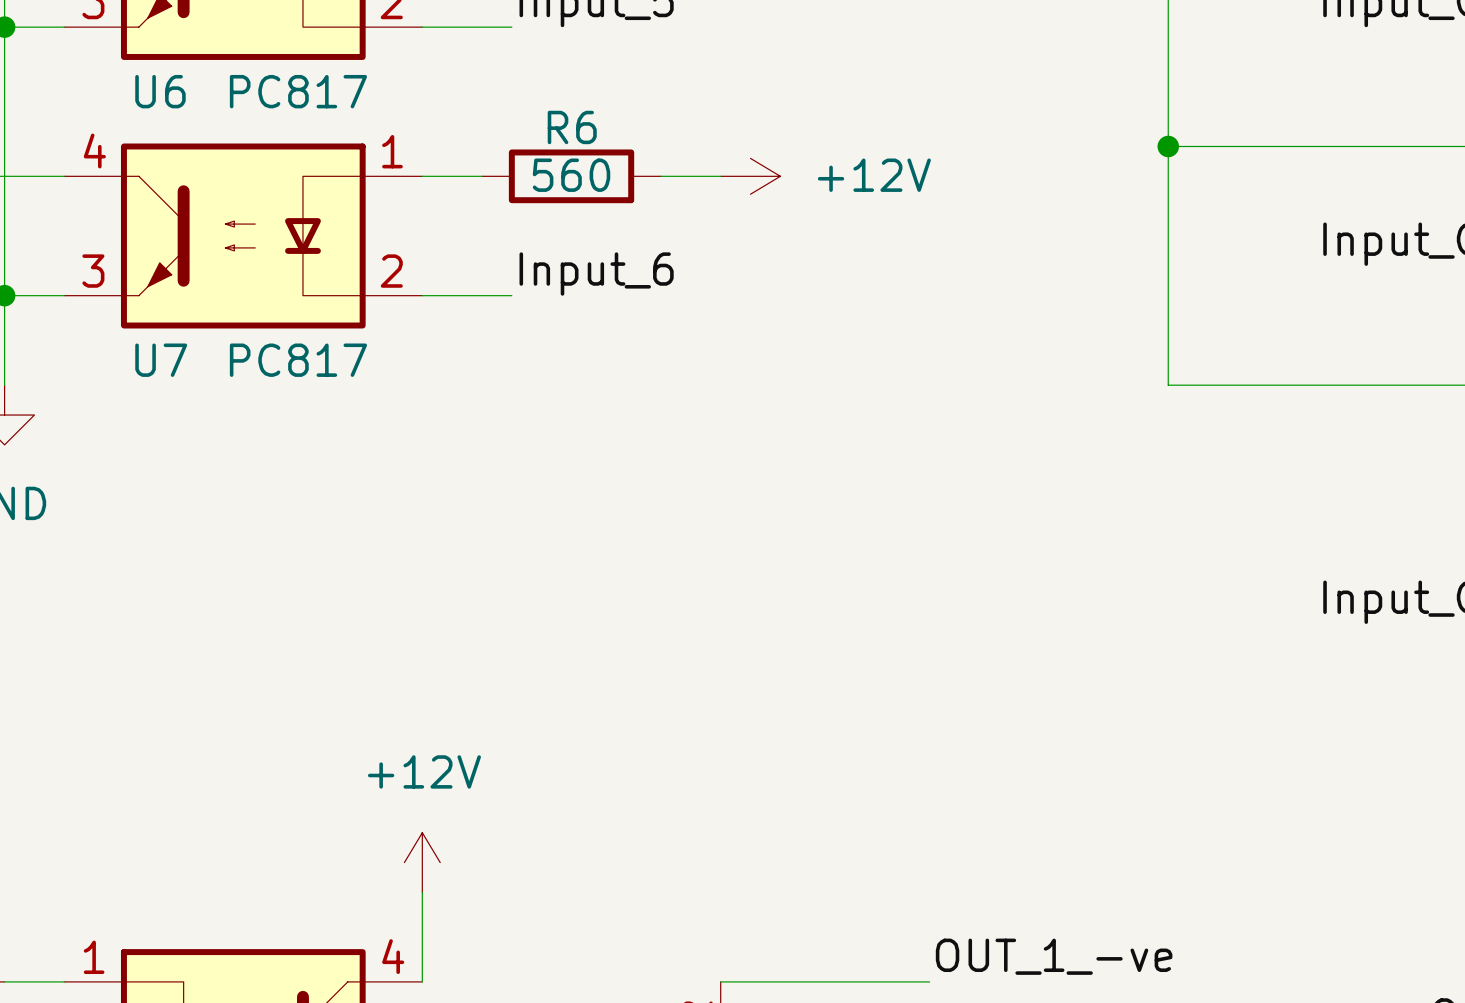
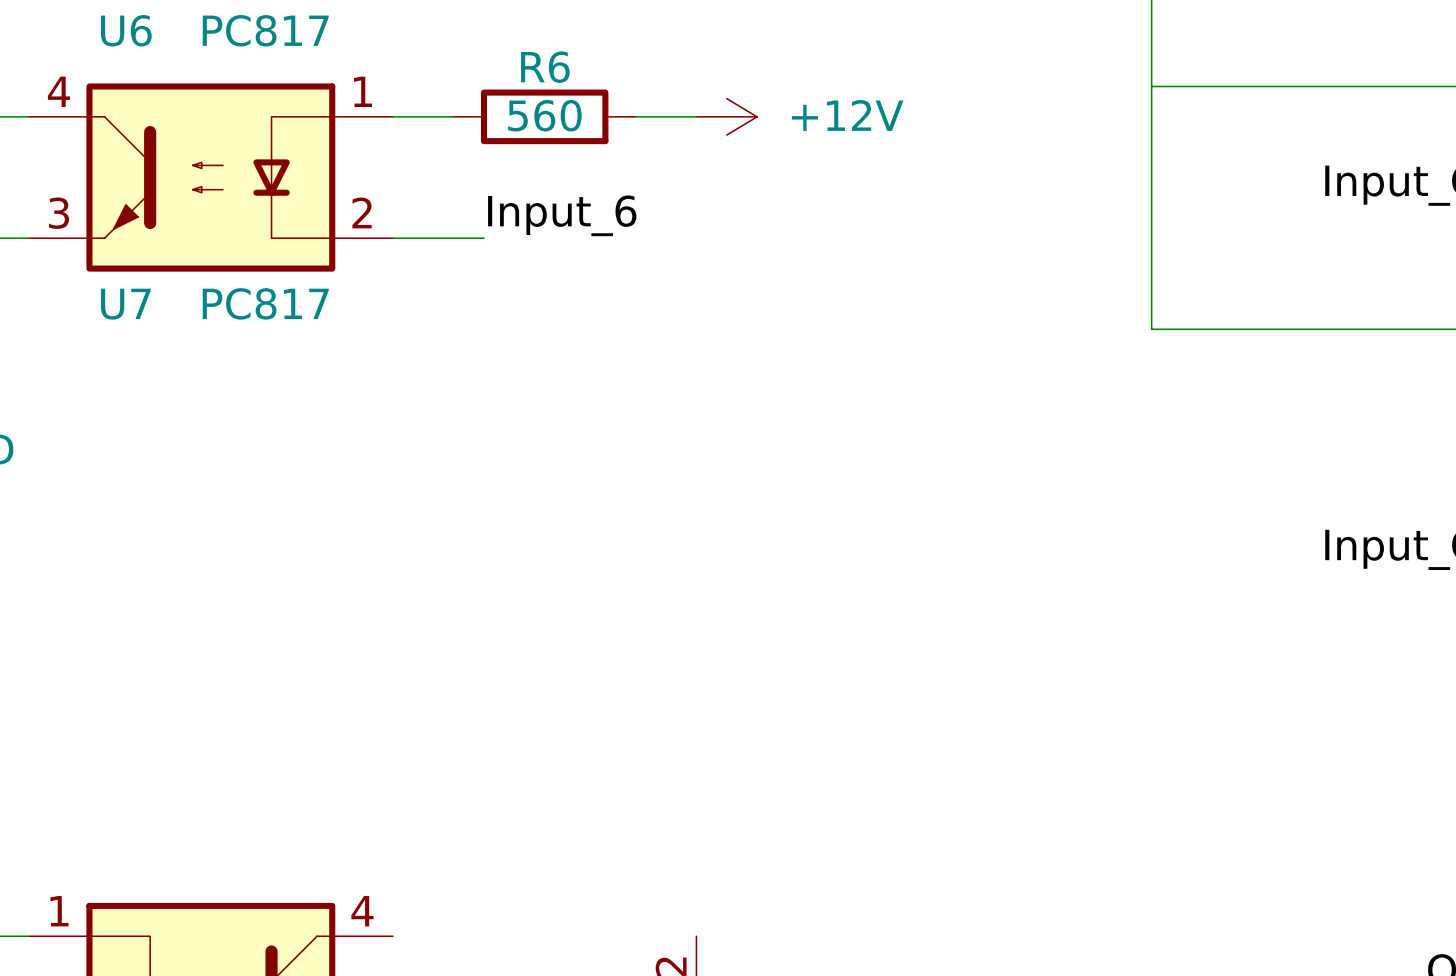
junction: (1168, 146) -> none
power symbol: +12V (422, 862) -> none
wire: (422, 892) (422, 981) -> none
label: OUT_1_-ve (1054, 956) -> none
wire: (720, 981) (929, 981) -> none

